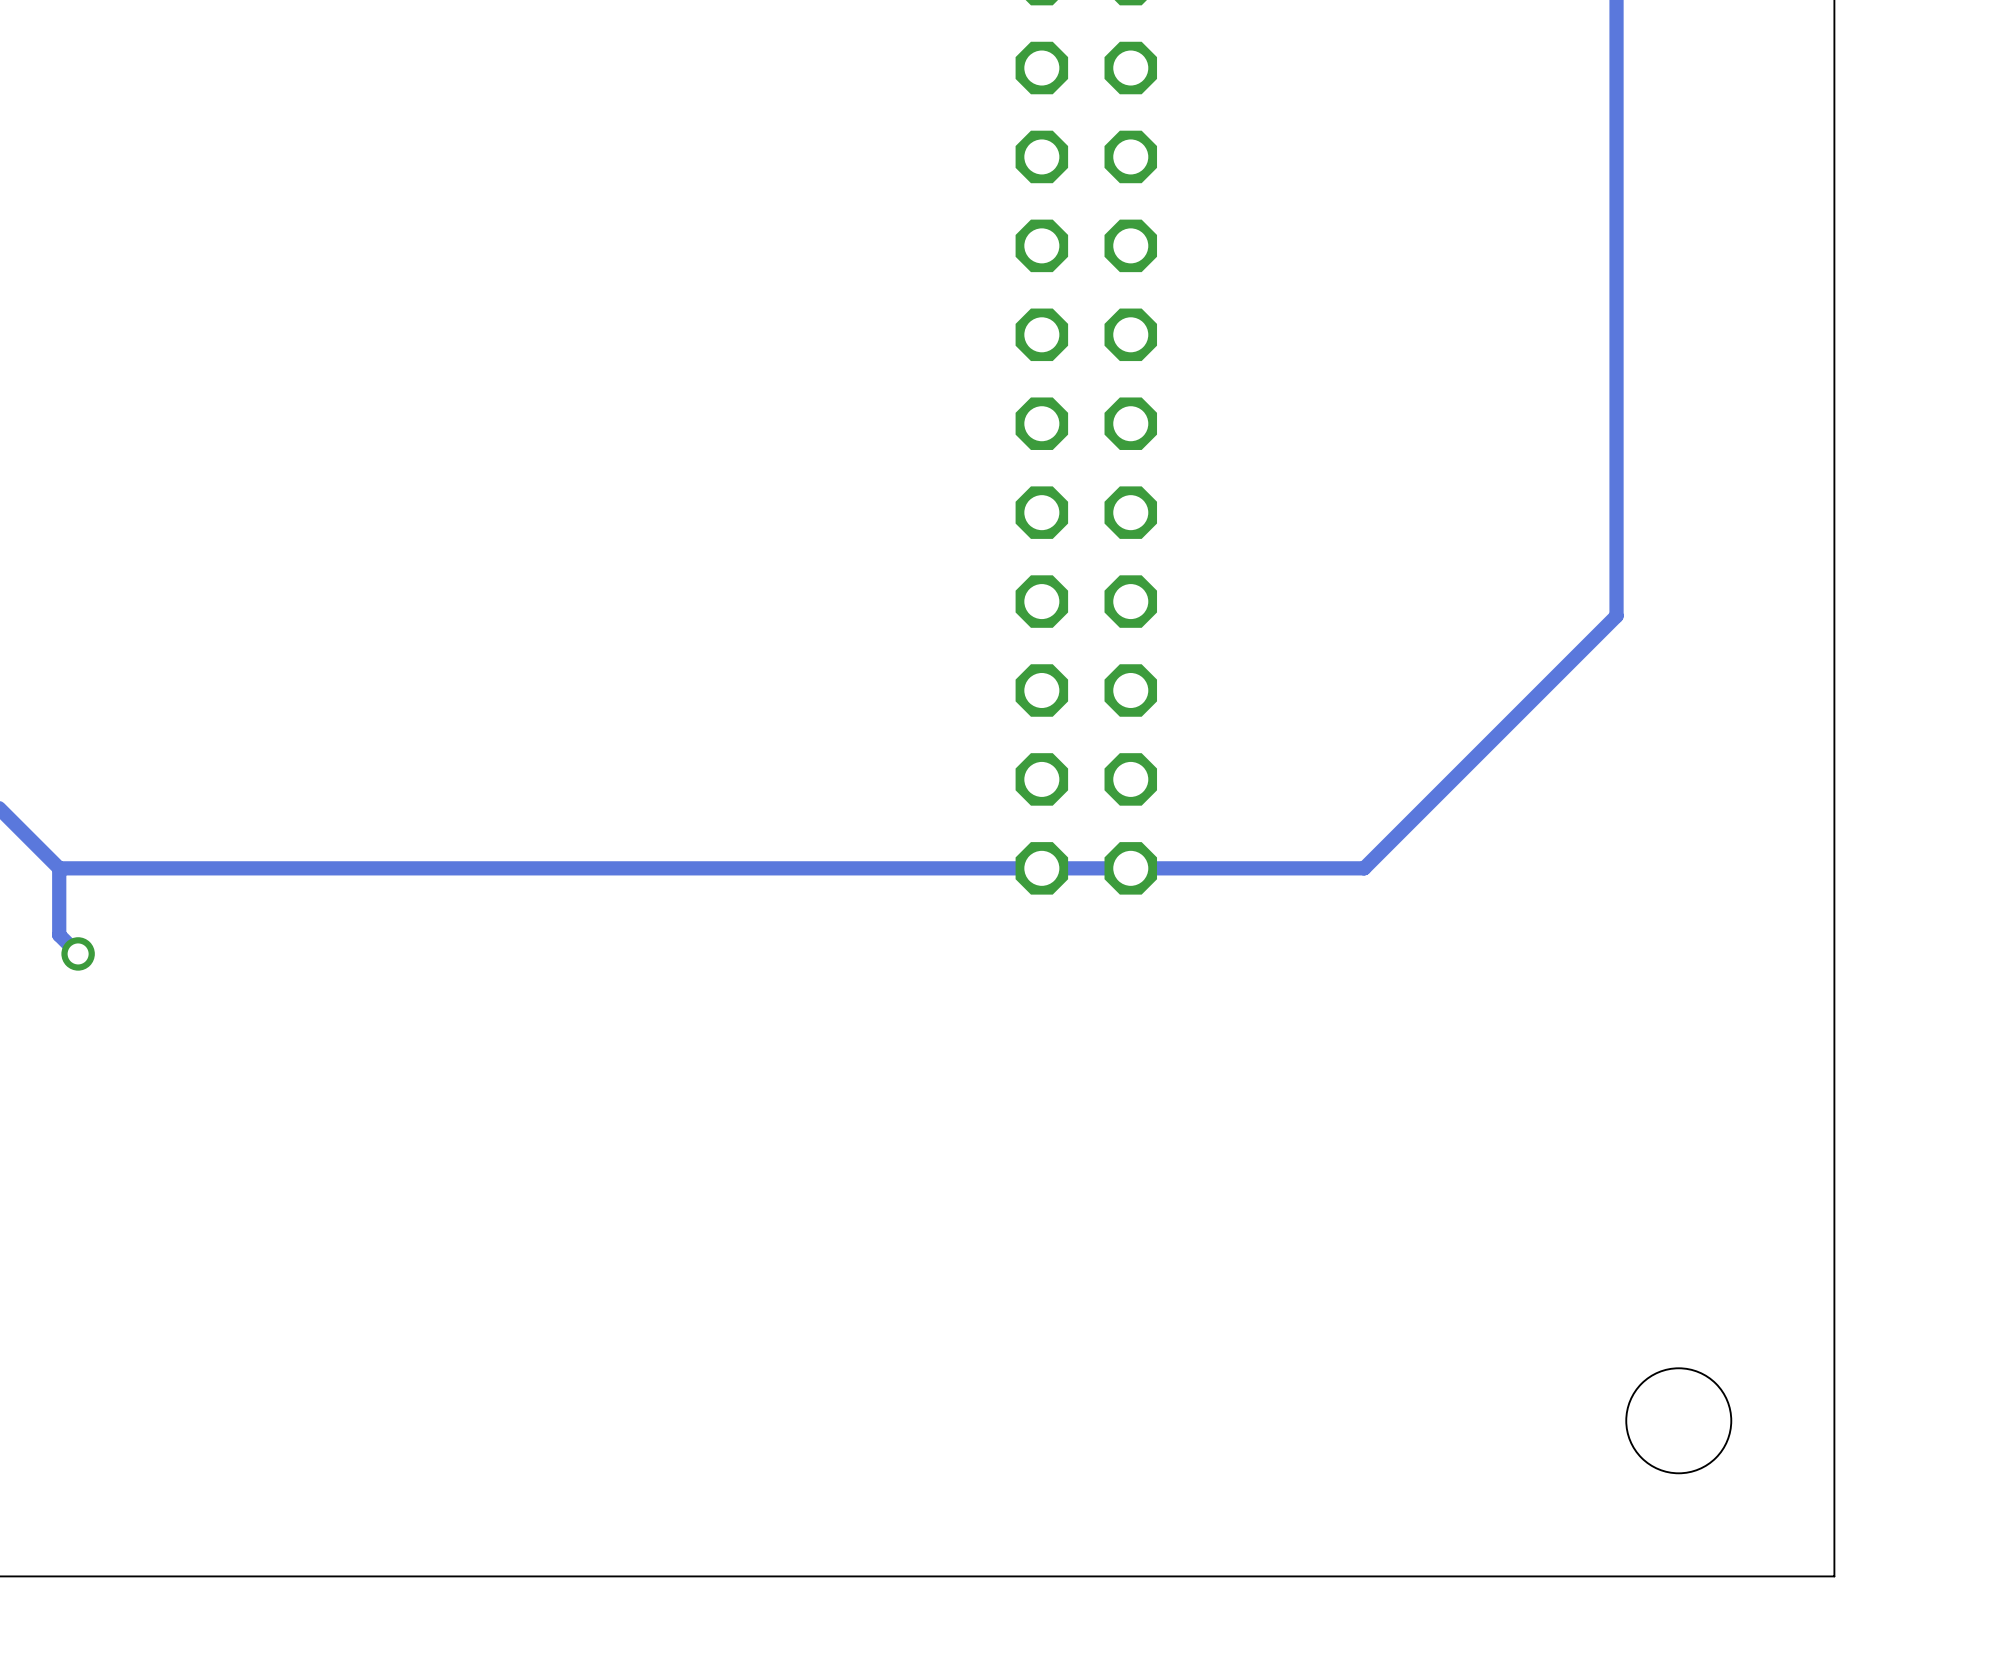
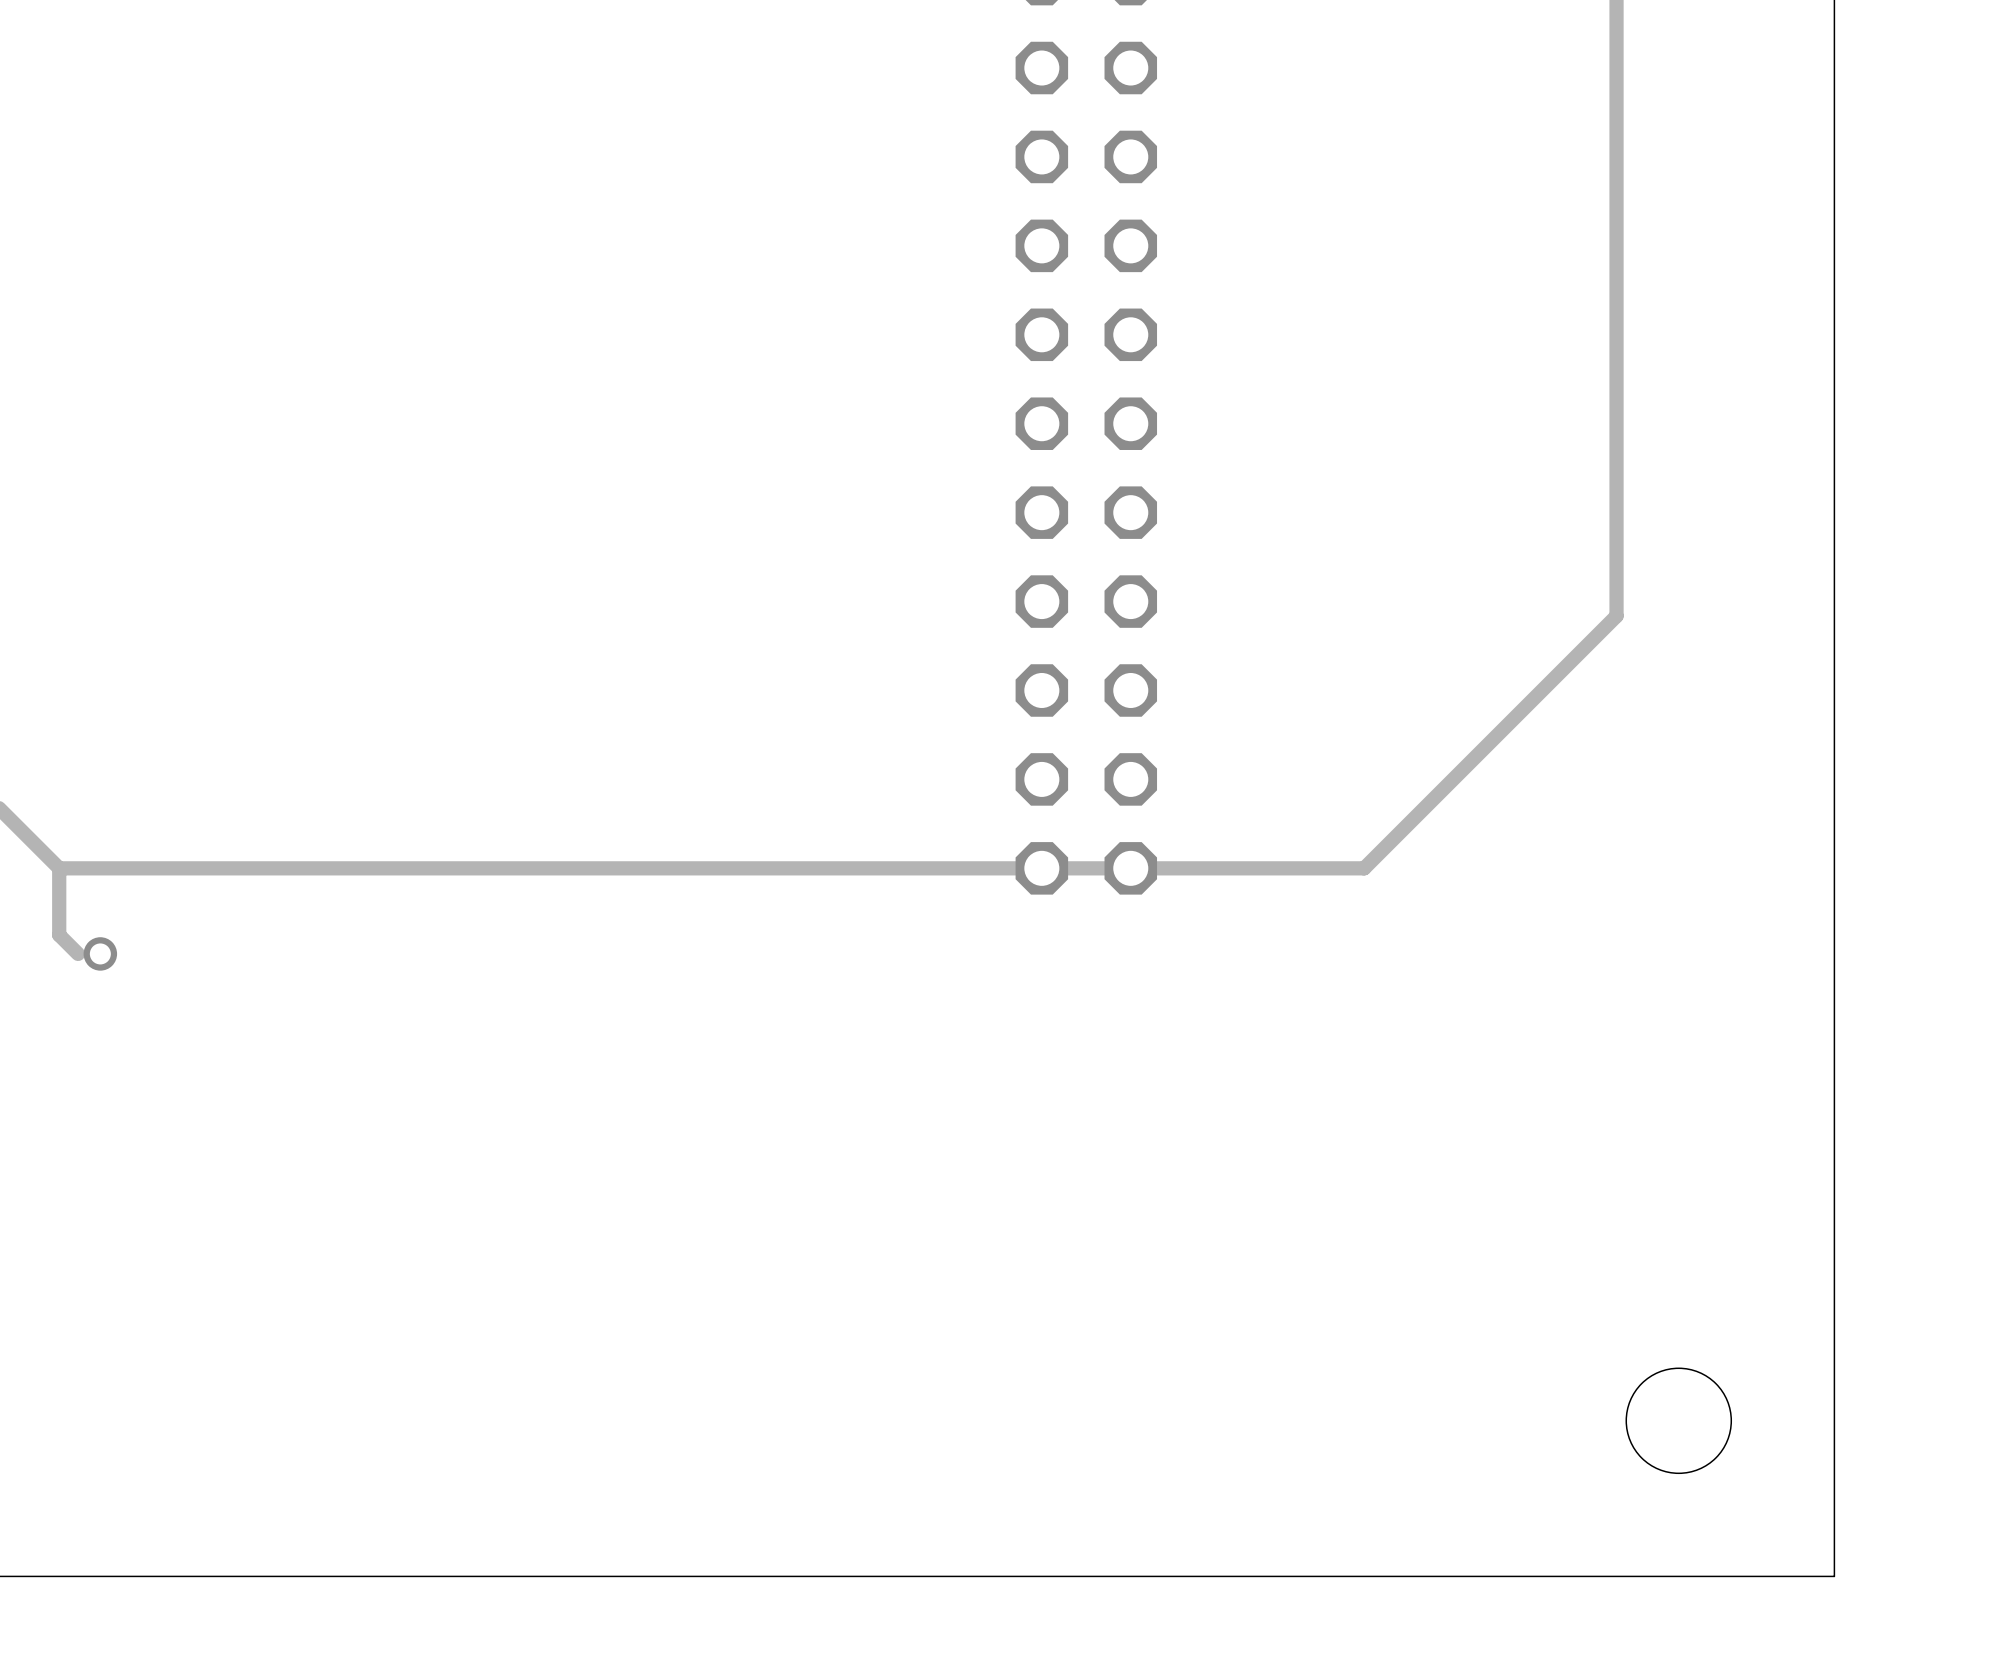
via position: (78, 953) -> (100, 953)

